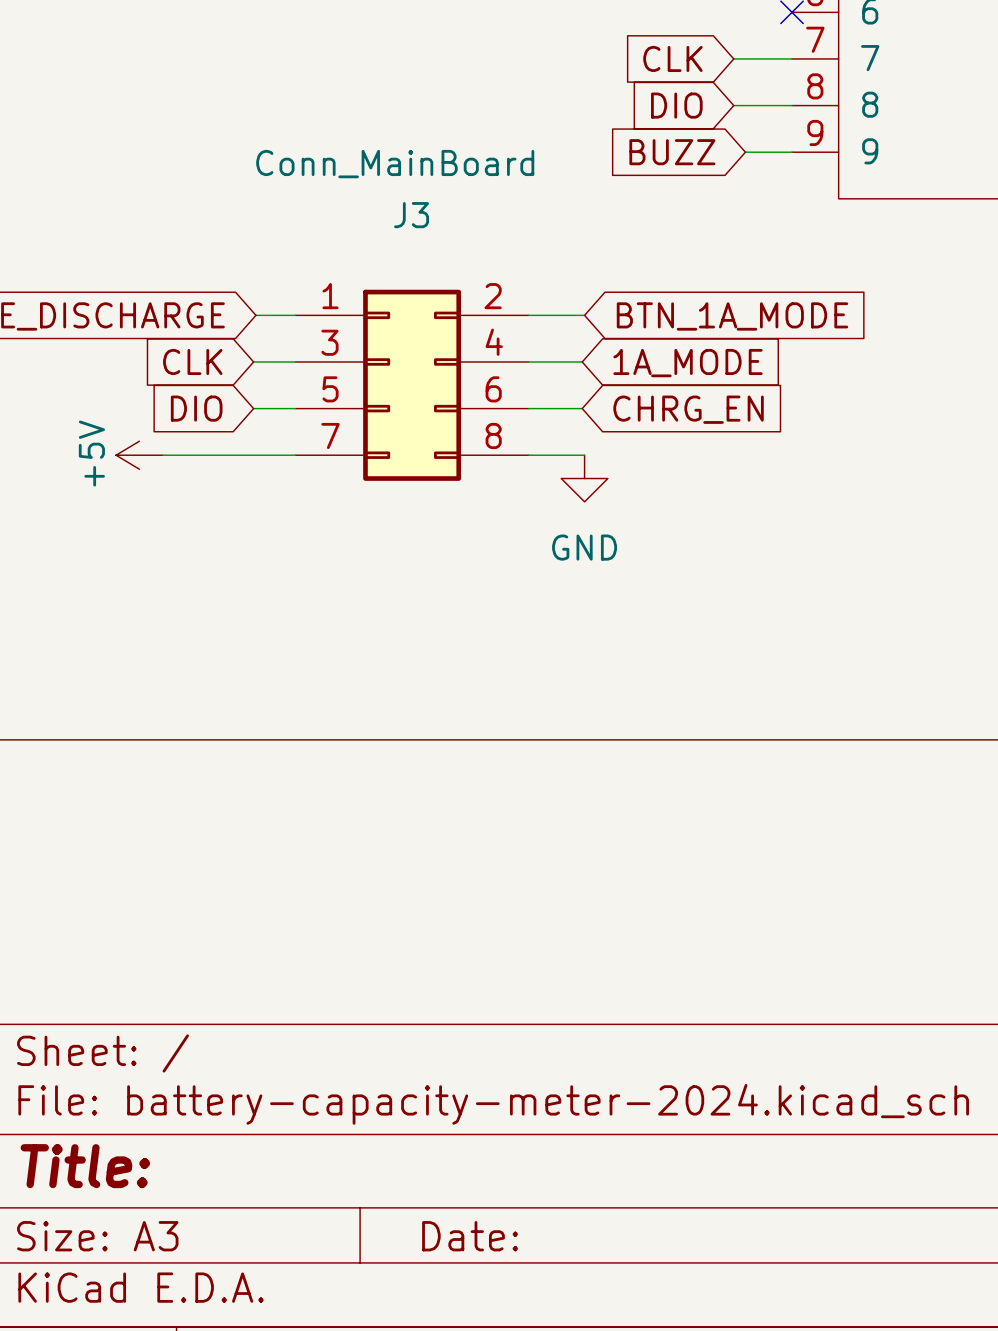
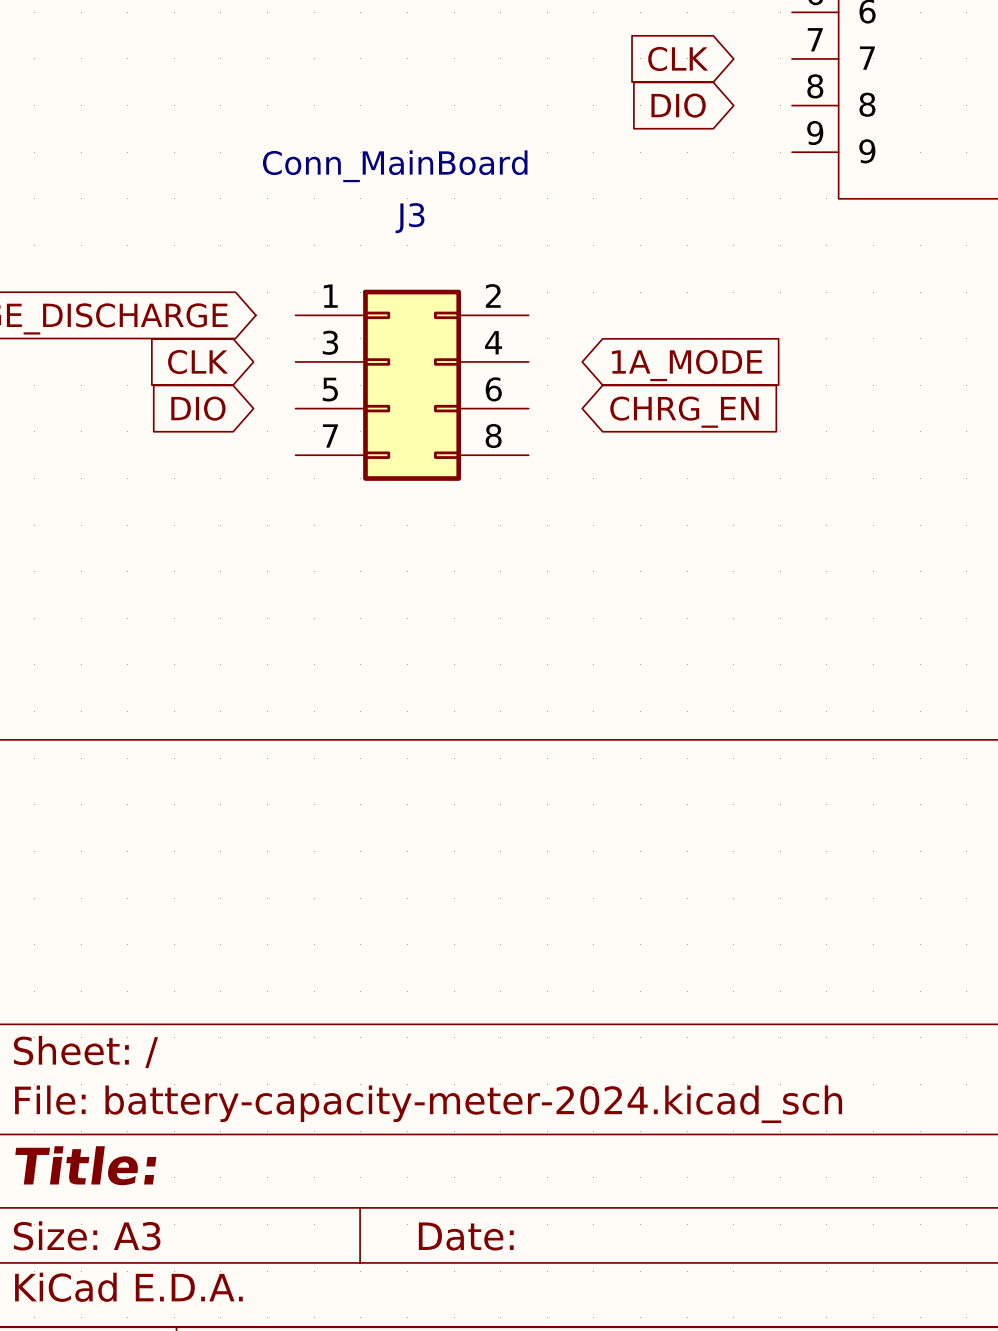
no-connect mark: (792, 12) -> none
wire: (733, 58) (792, 58) -> none
wire: (733, 105) (792, 105) -> none
global label: BUZZ (672, 152) -> none
wire: (745, 152) (792, 152) -> none
wire: (255, 315) (295, 315) -> none
wire: (528, 315) (584, 315) -> none
global label: BTN_1A_MODE (732, 316) -> none
wire: (253, 361) (295, 361) -> none
wire: (528, 361) (582, 361) -> none
wire: (253, 408) (295, 408) -> none
wire: (528, 408) (582, 408) -> none
power symbol: +5V (139, 455) -> none
wire: (162, 455) (295, 455) -> none
wire: (528, 455) (584, 455) -> none
power symbol: GND (584, 478) -> none

